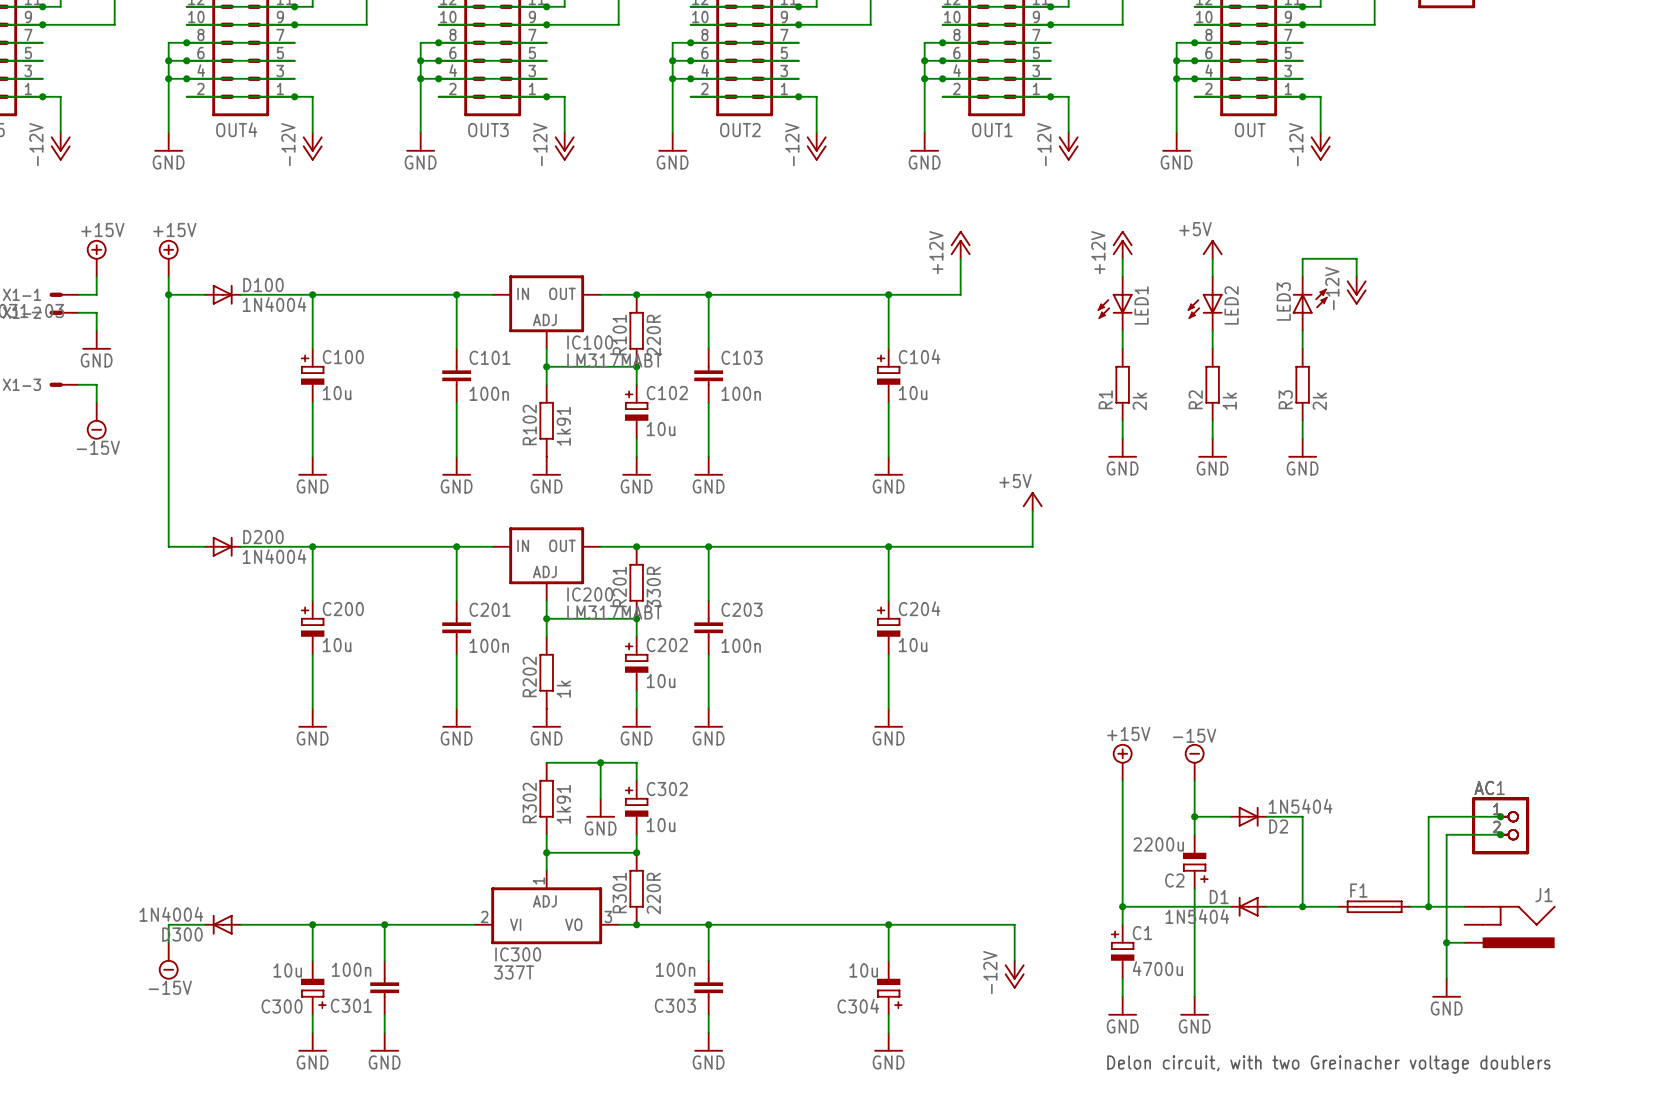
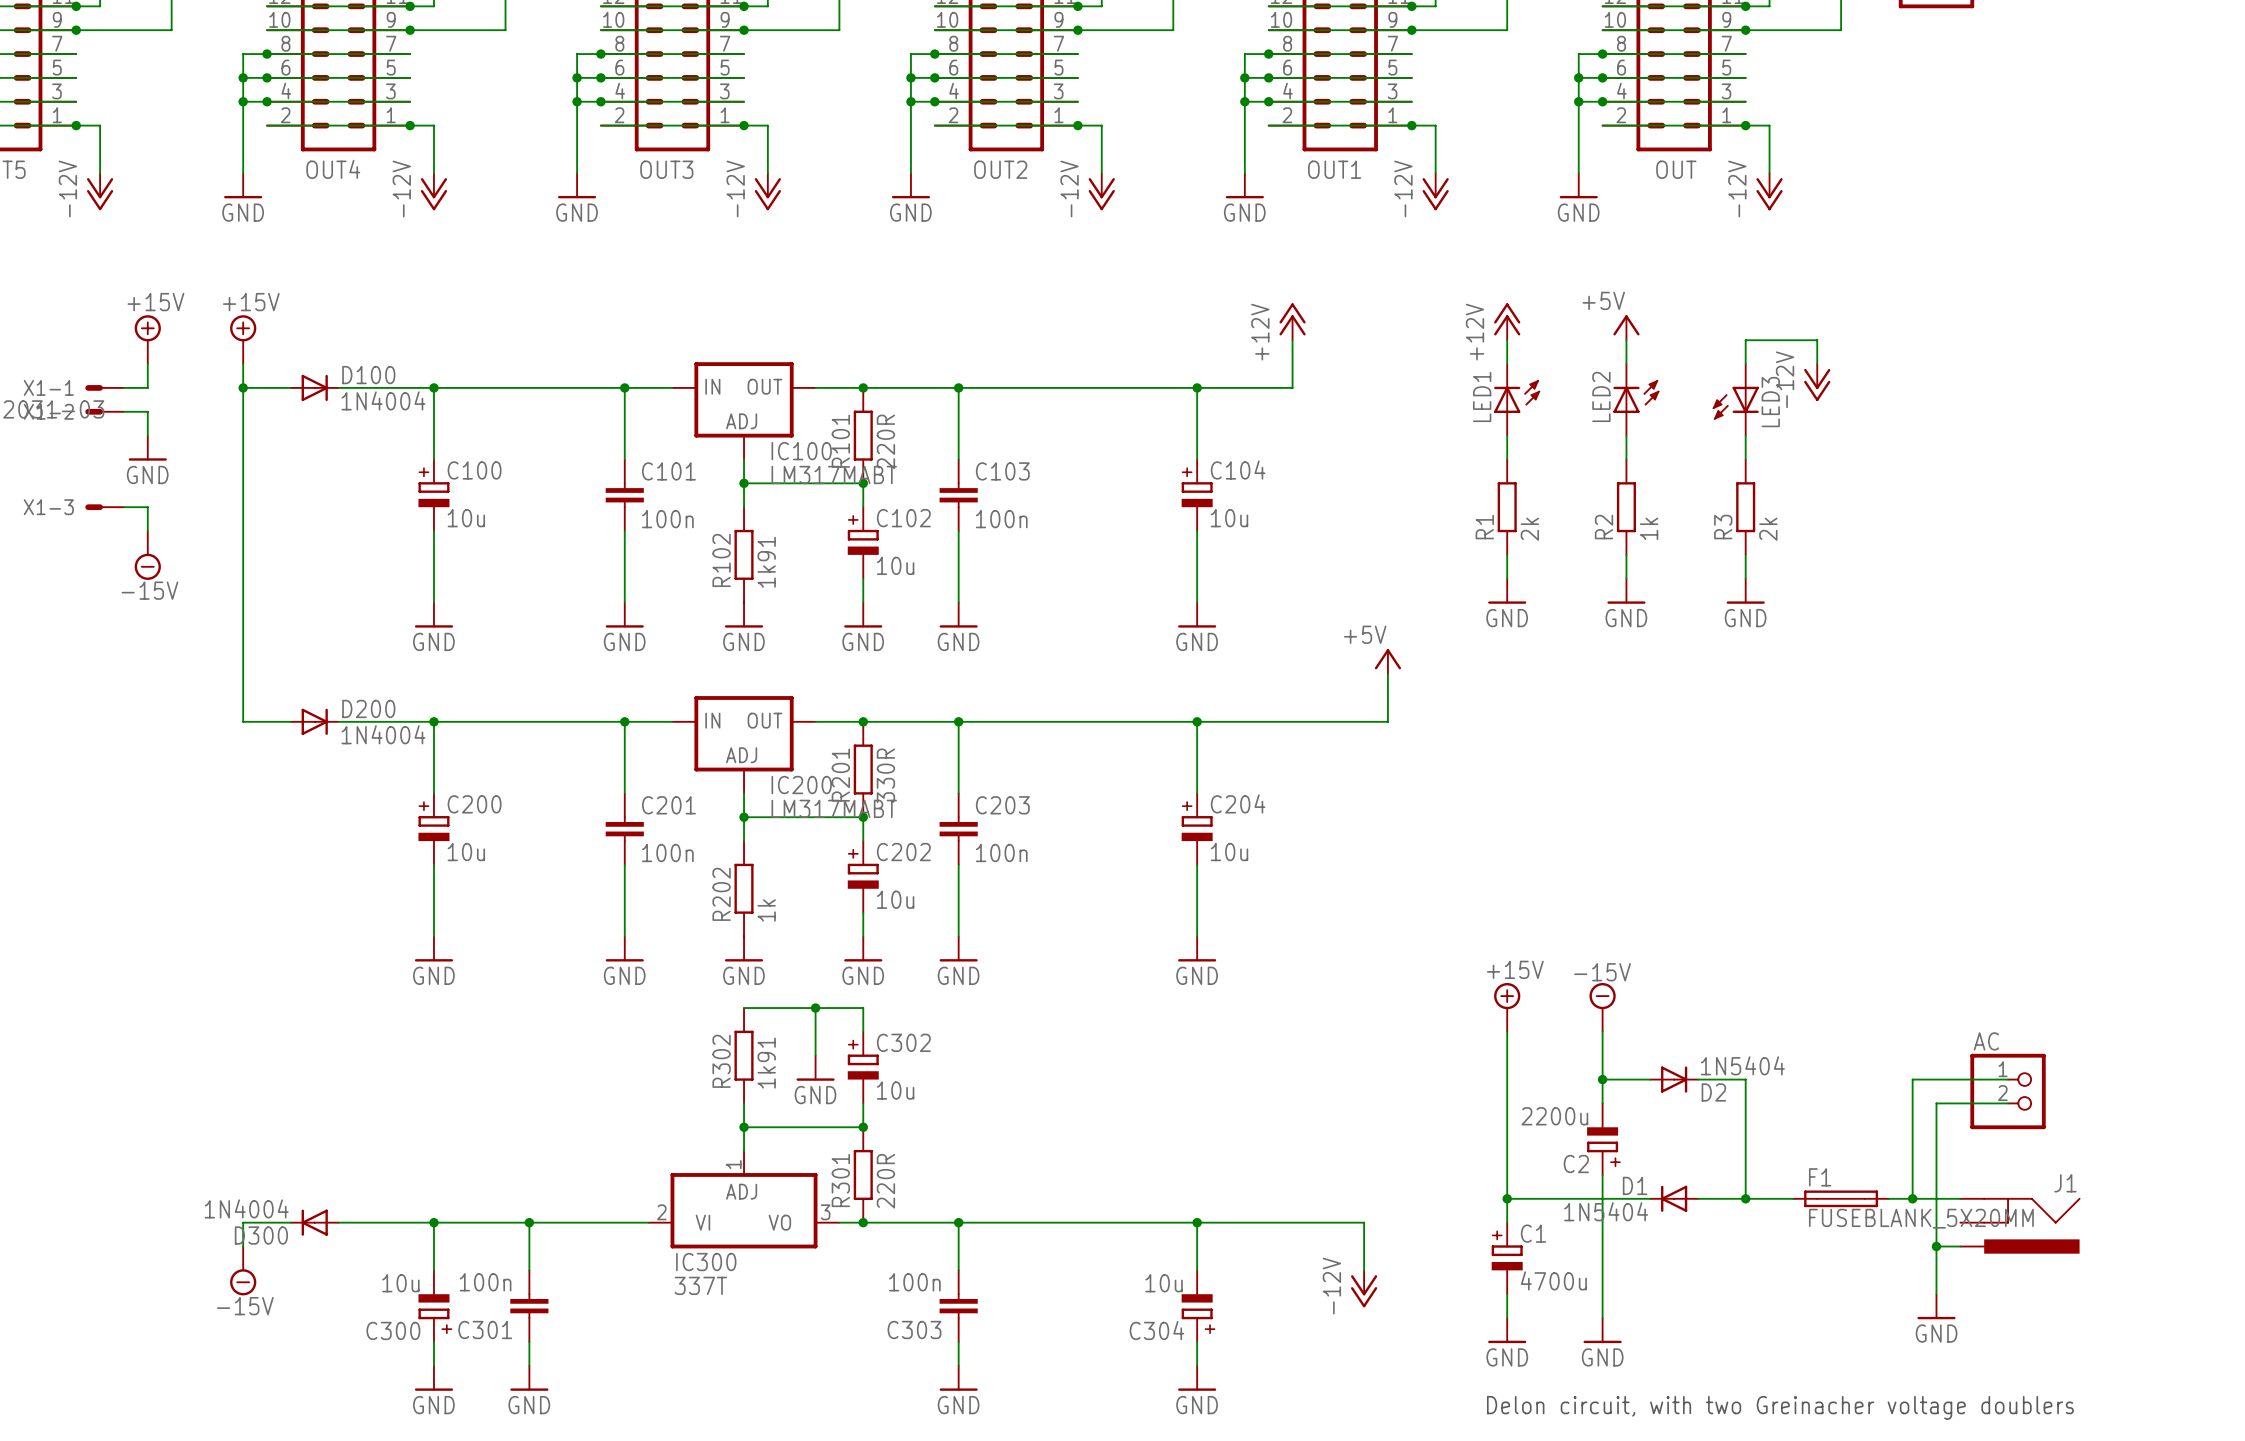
LED3 rotation: 0° (1310, 301) -> 180° (1735, 403)
LED1 rotation: 0° (1115, 306) -> 180° (1517, 396)
LED2 rotation: 0° (1205, 306) -> 180° (1636, 396)
junction: (1500, 816) -> none
part: (1500, 825) -> none
junction: (1500, 834) -> none
F1 value: none -> FUSEBLANK_5X20MM (1921, 1218)

